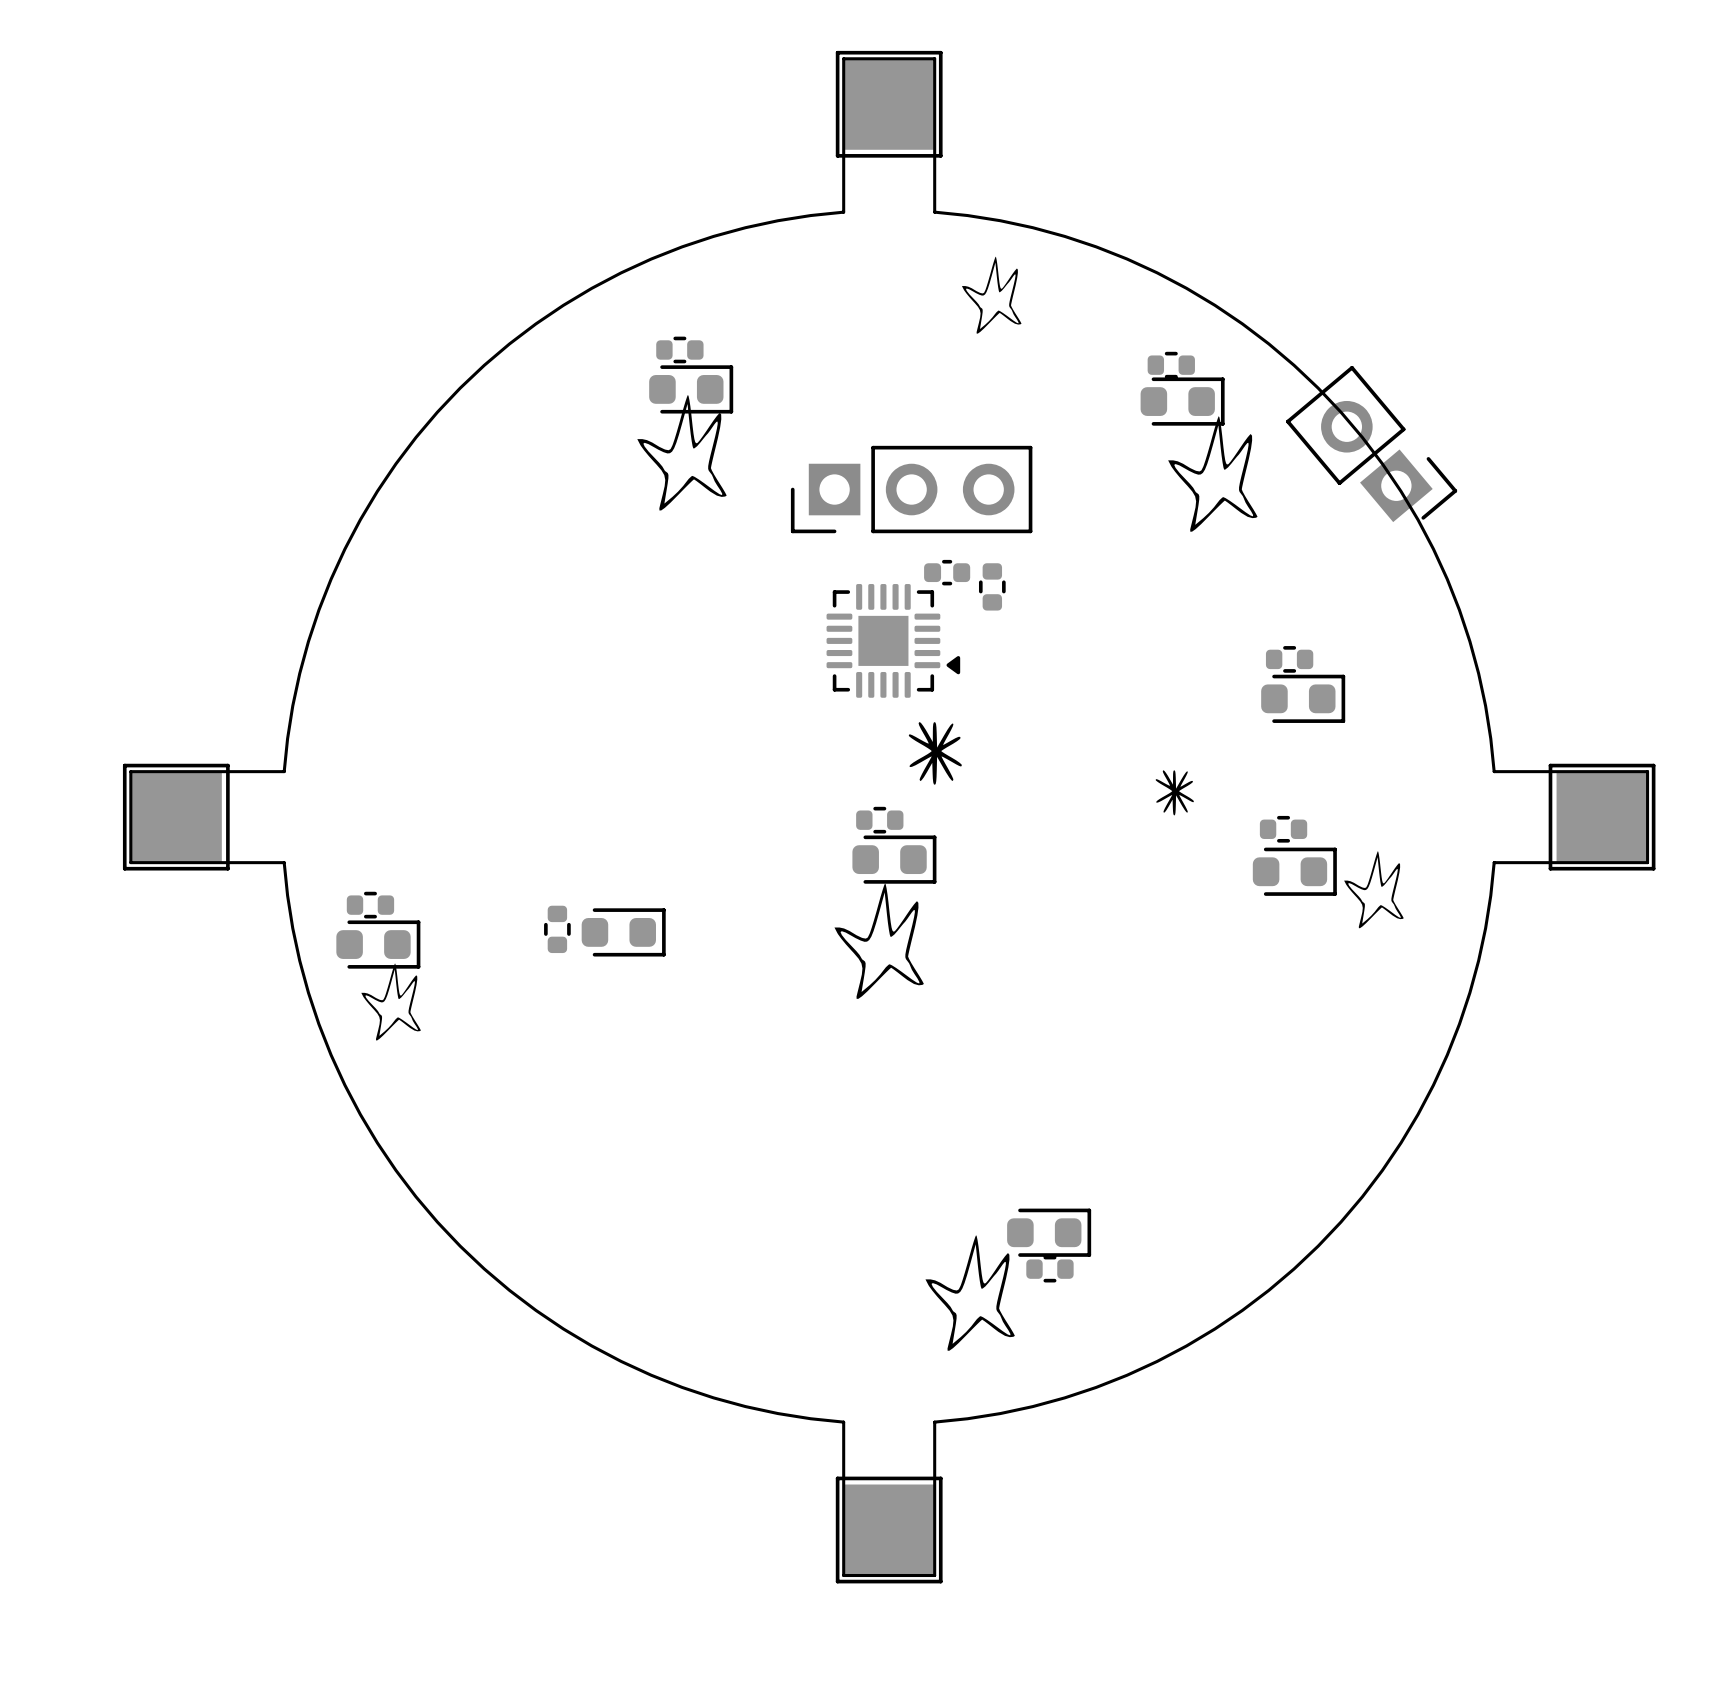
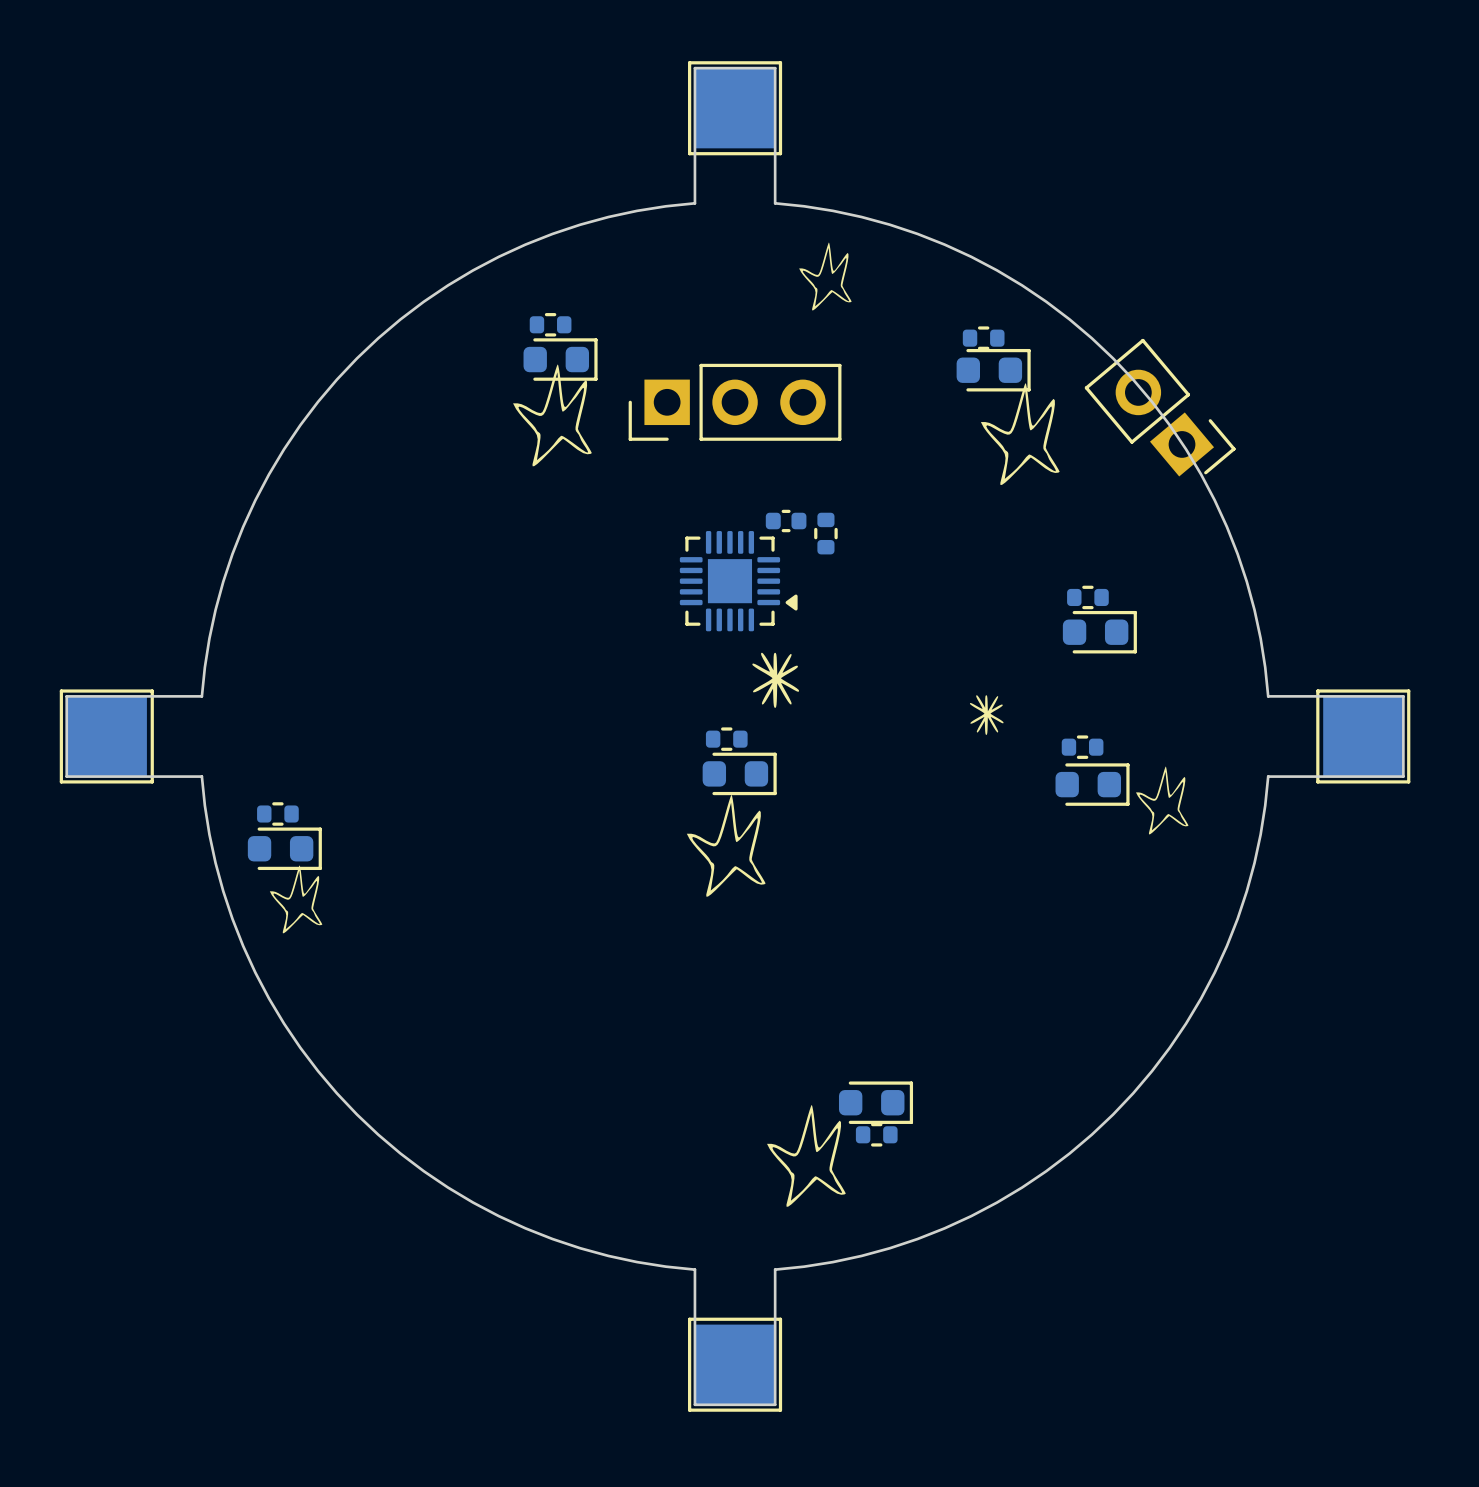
part position: (911, 489) -> (735, 402)
part: (557, 929) -> none
part: (623, 932) -> none

